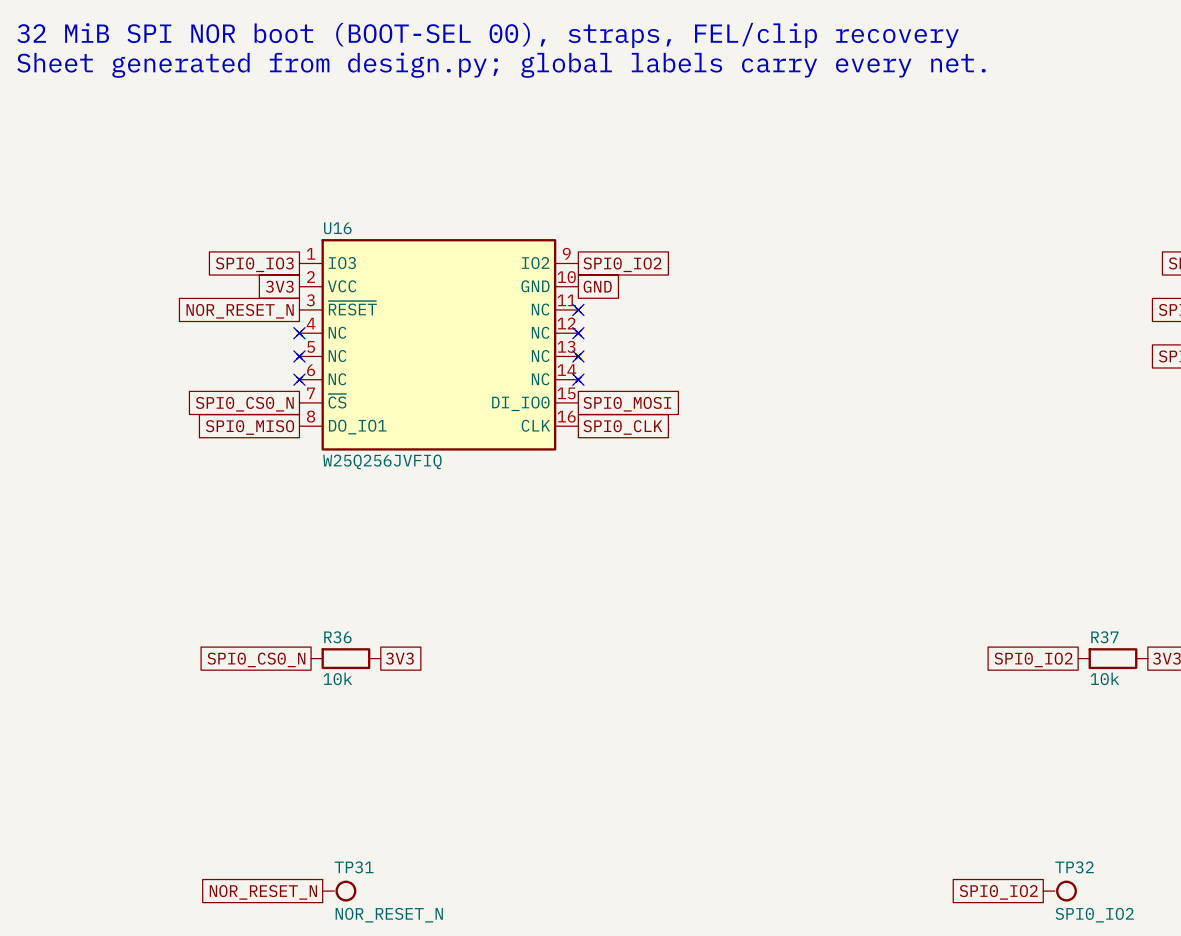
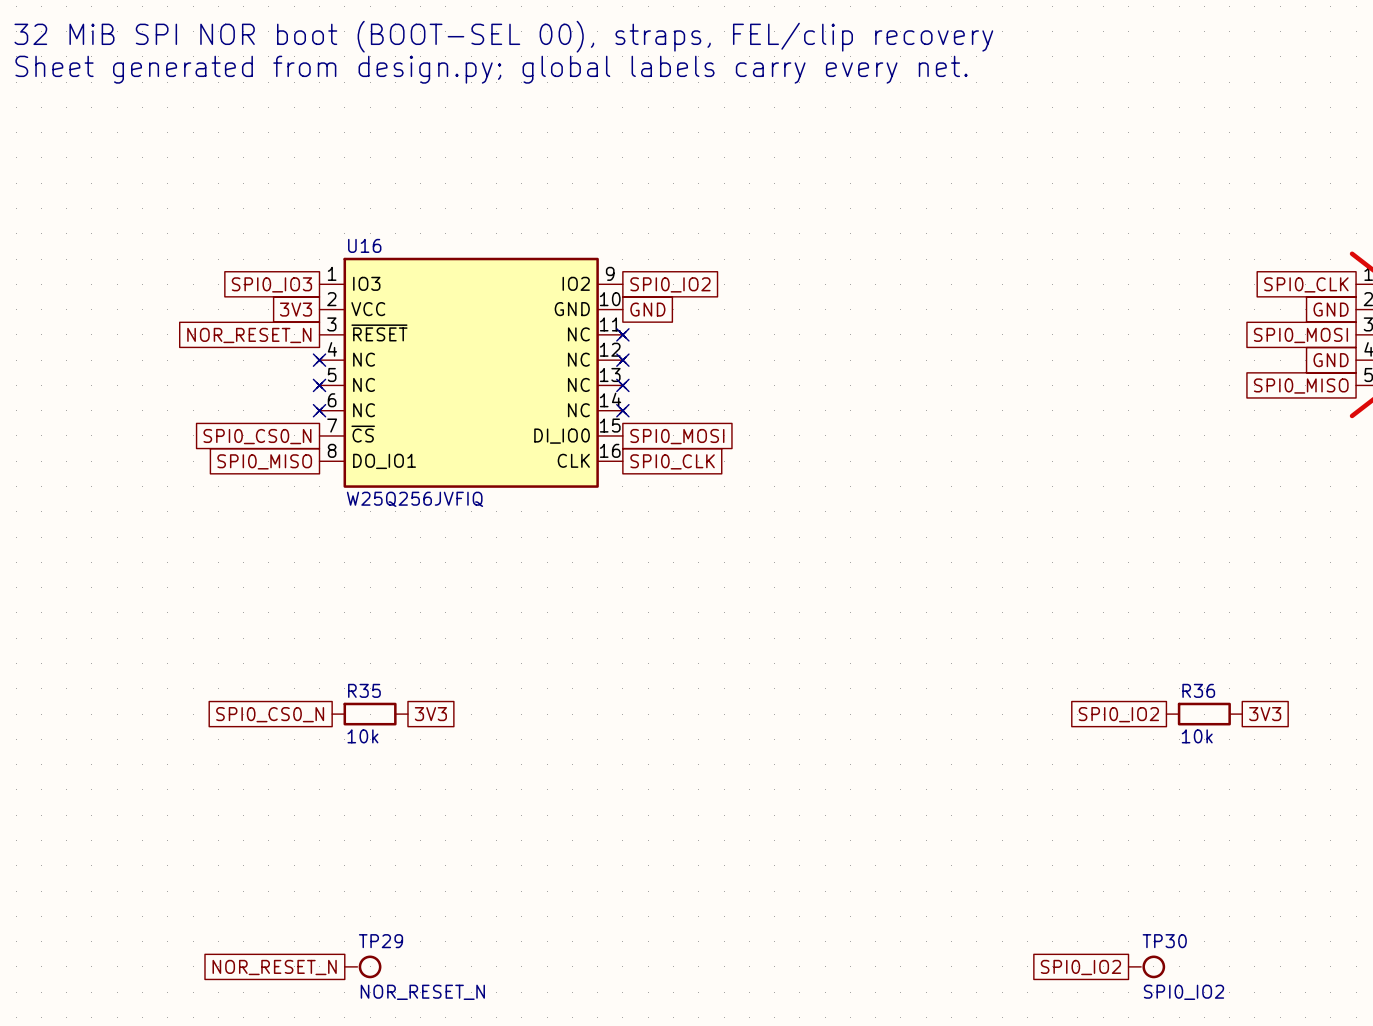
R36 name: R36 (337, 637) -> R35 (364, 690)
R37 name: R37 (1104, 637) -> R36 (1198, 690)
TP31 name: TP31 (354, 867) -> TP29 (380, 941)
TP32 name: TP32 (1074, 867) -> TP30 (1164, 941)

